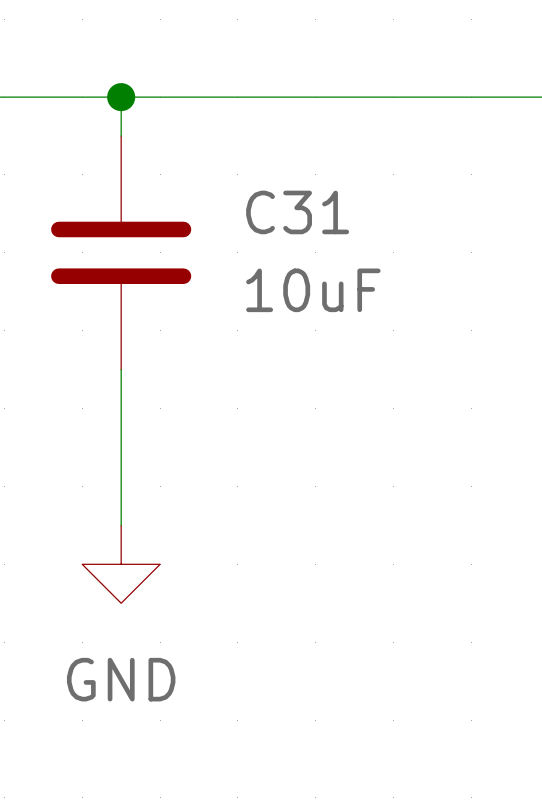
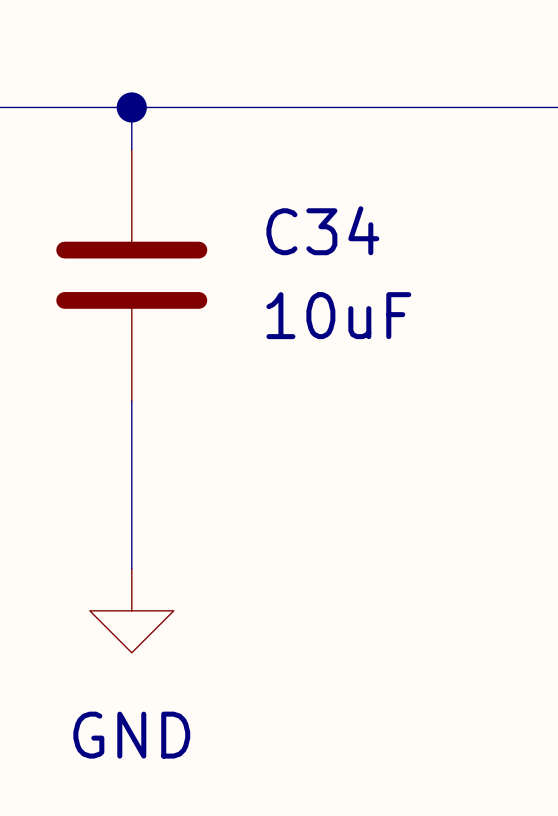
C31 name: C31 (297, 212) -> C34 (322, 230)

